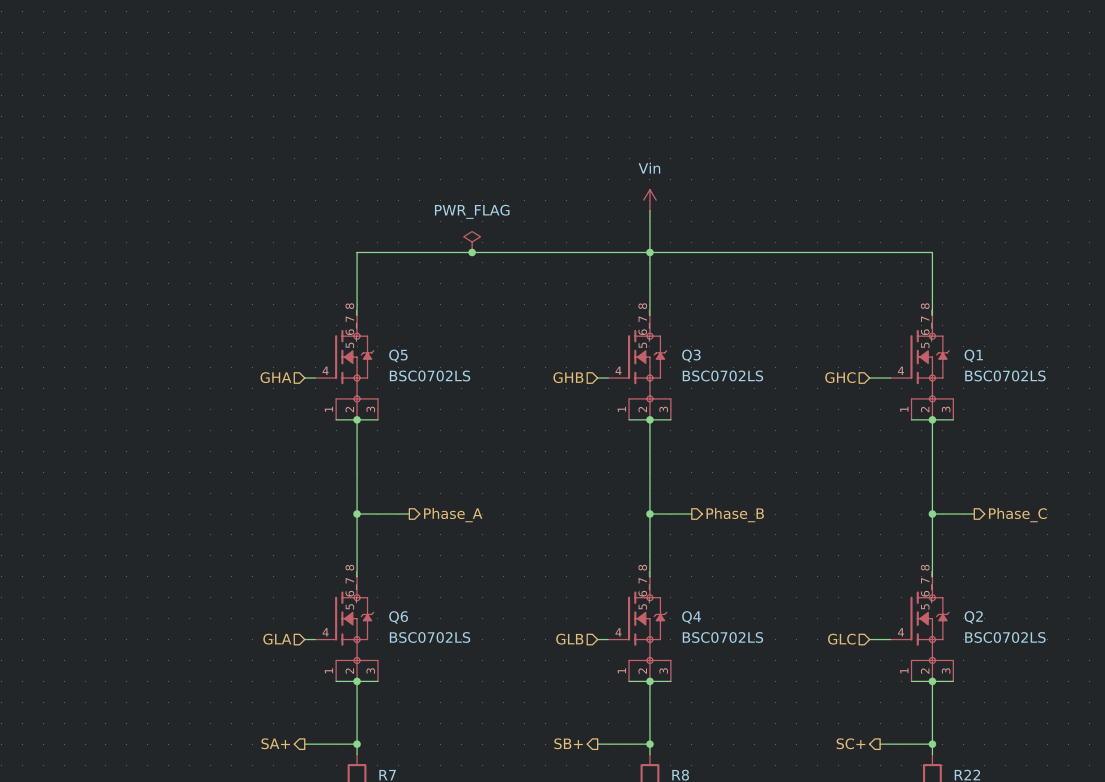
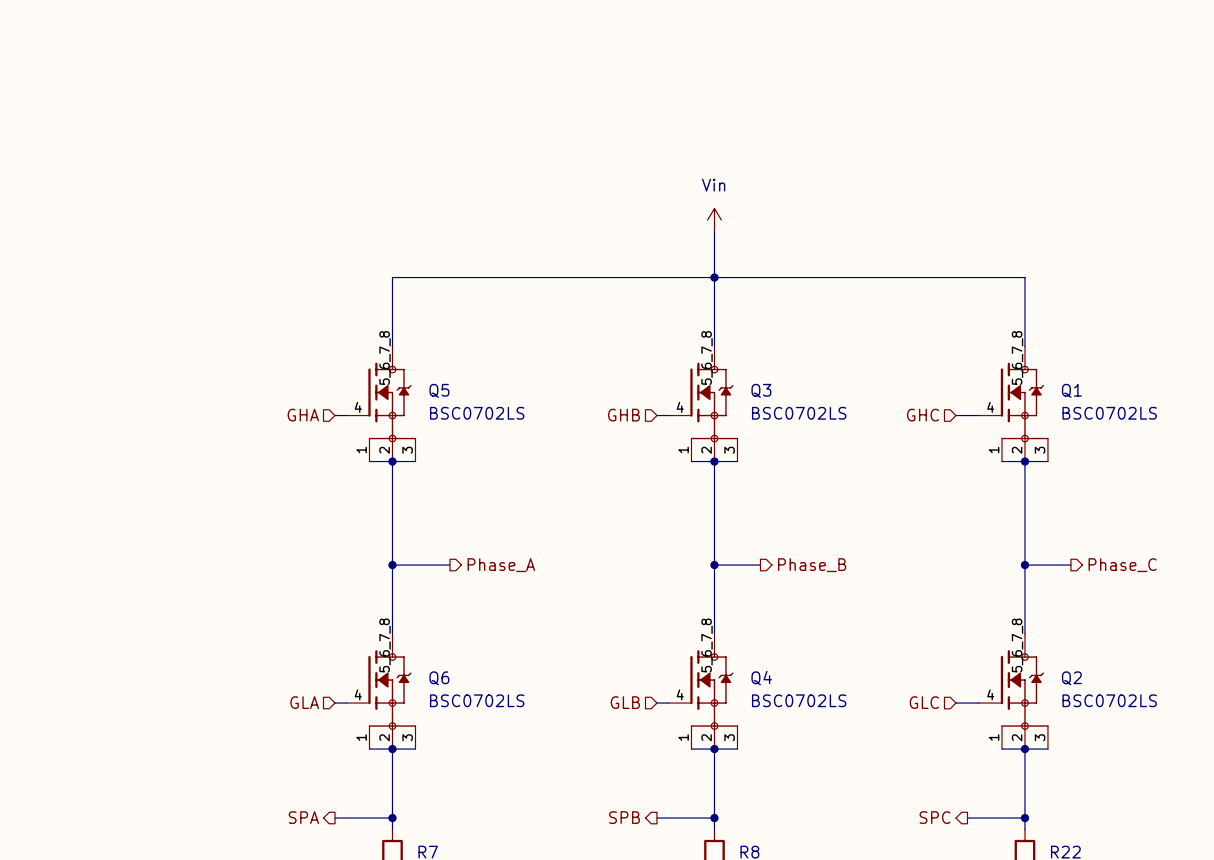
power symbol: PWR_FLAG (472, 242) -> none
junction: (472, 252) -> none
hierarchical label: SA+ (275, 743) -> SPA (303, 817)
hierarchical label: SB+ (568, 743) -> SPB (624, 817)
hierarchical label: SC+ (850, 743) -> SPC (934, 817)

